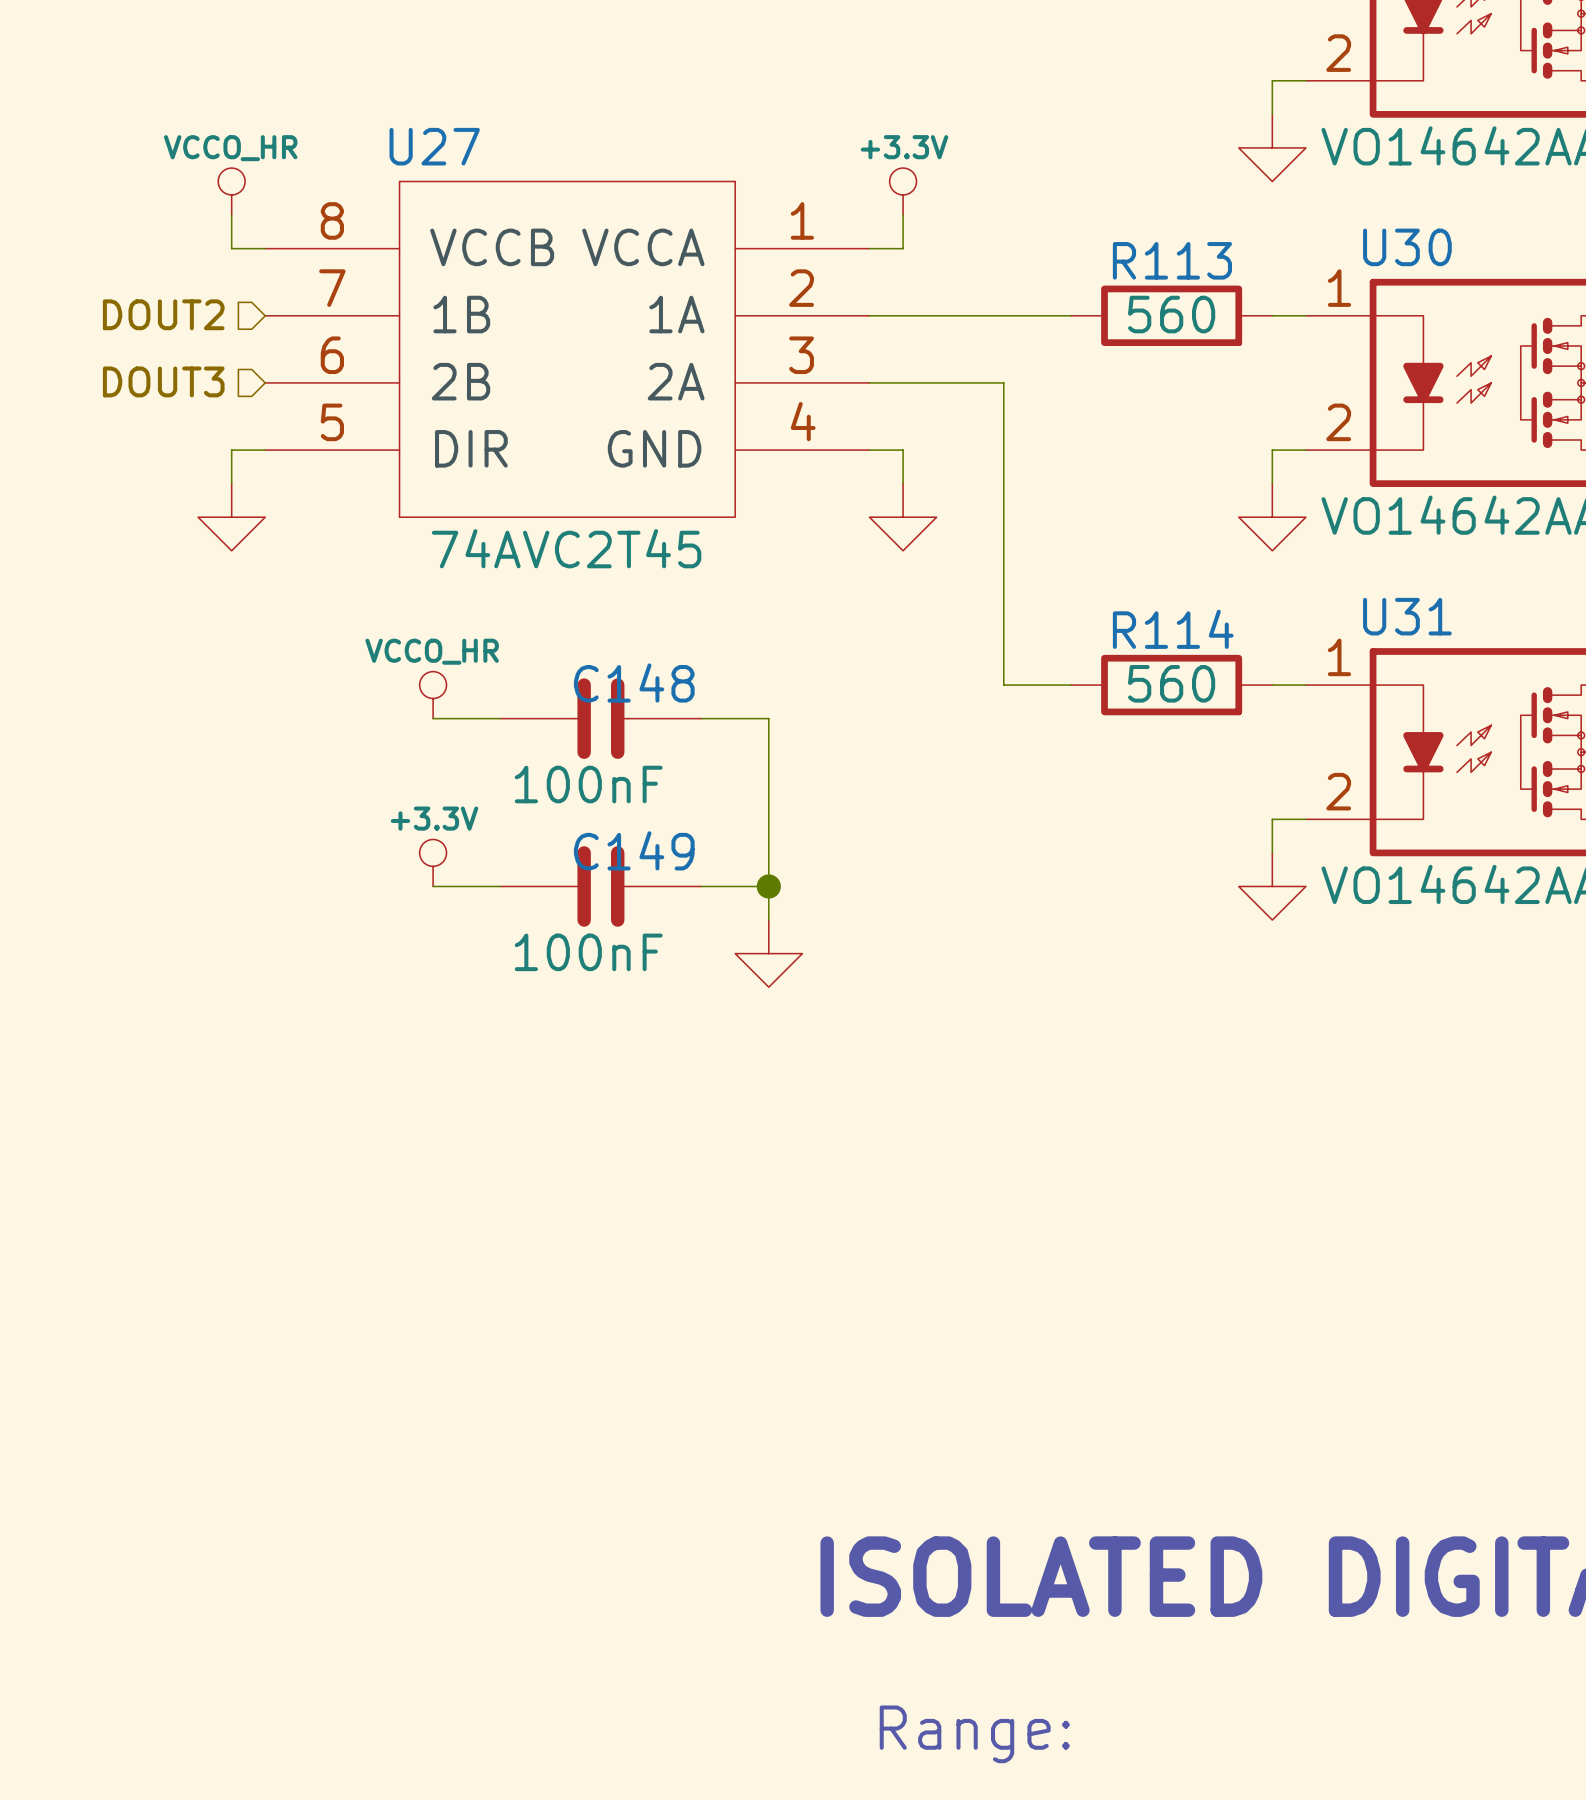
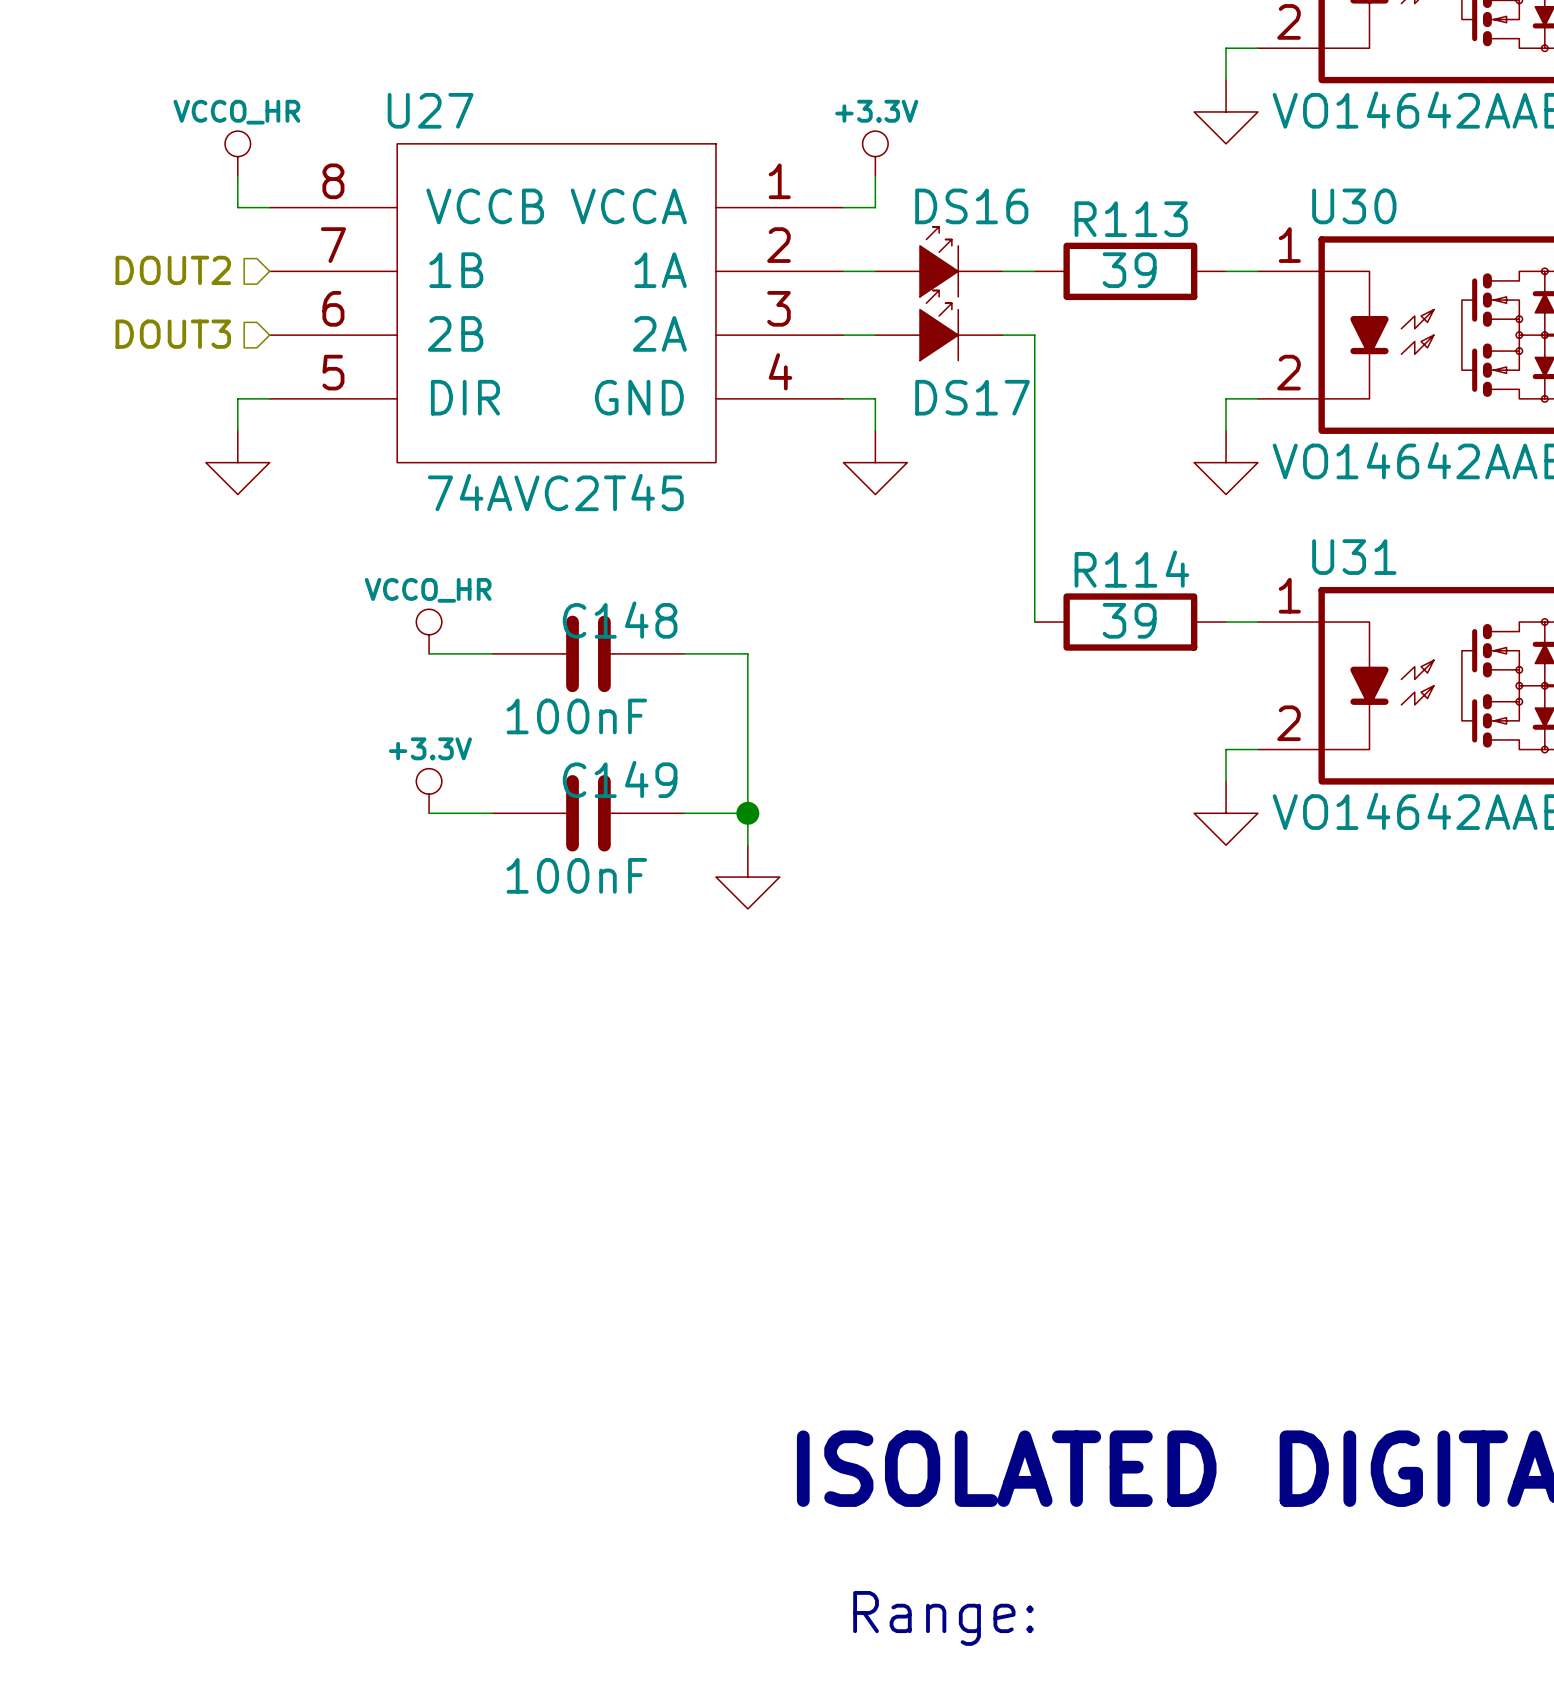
DS16: none -> (939, 261)
R113 value: 560 (1171, 314) -> 39 (1129, 270)
DS17: none -> (939, 325)
wire: (903, 382) (1003, 382) (1003, 685) (1070, 685) -> (1002, 335) (1034, 335) (1034, 622)
R114 value: 560 (1171, 683) -> 39 (1129, 620)

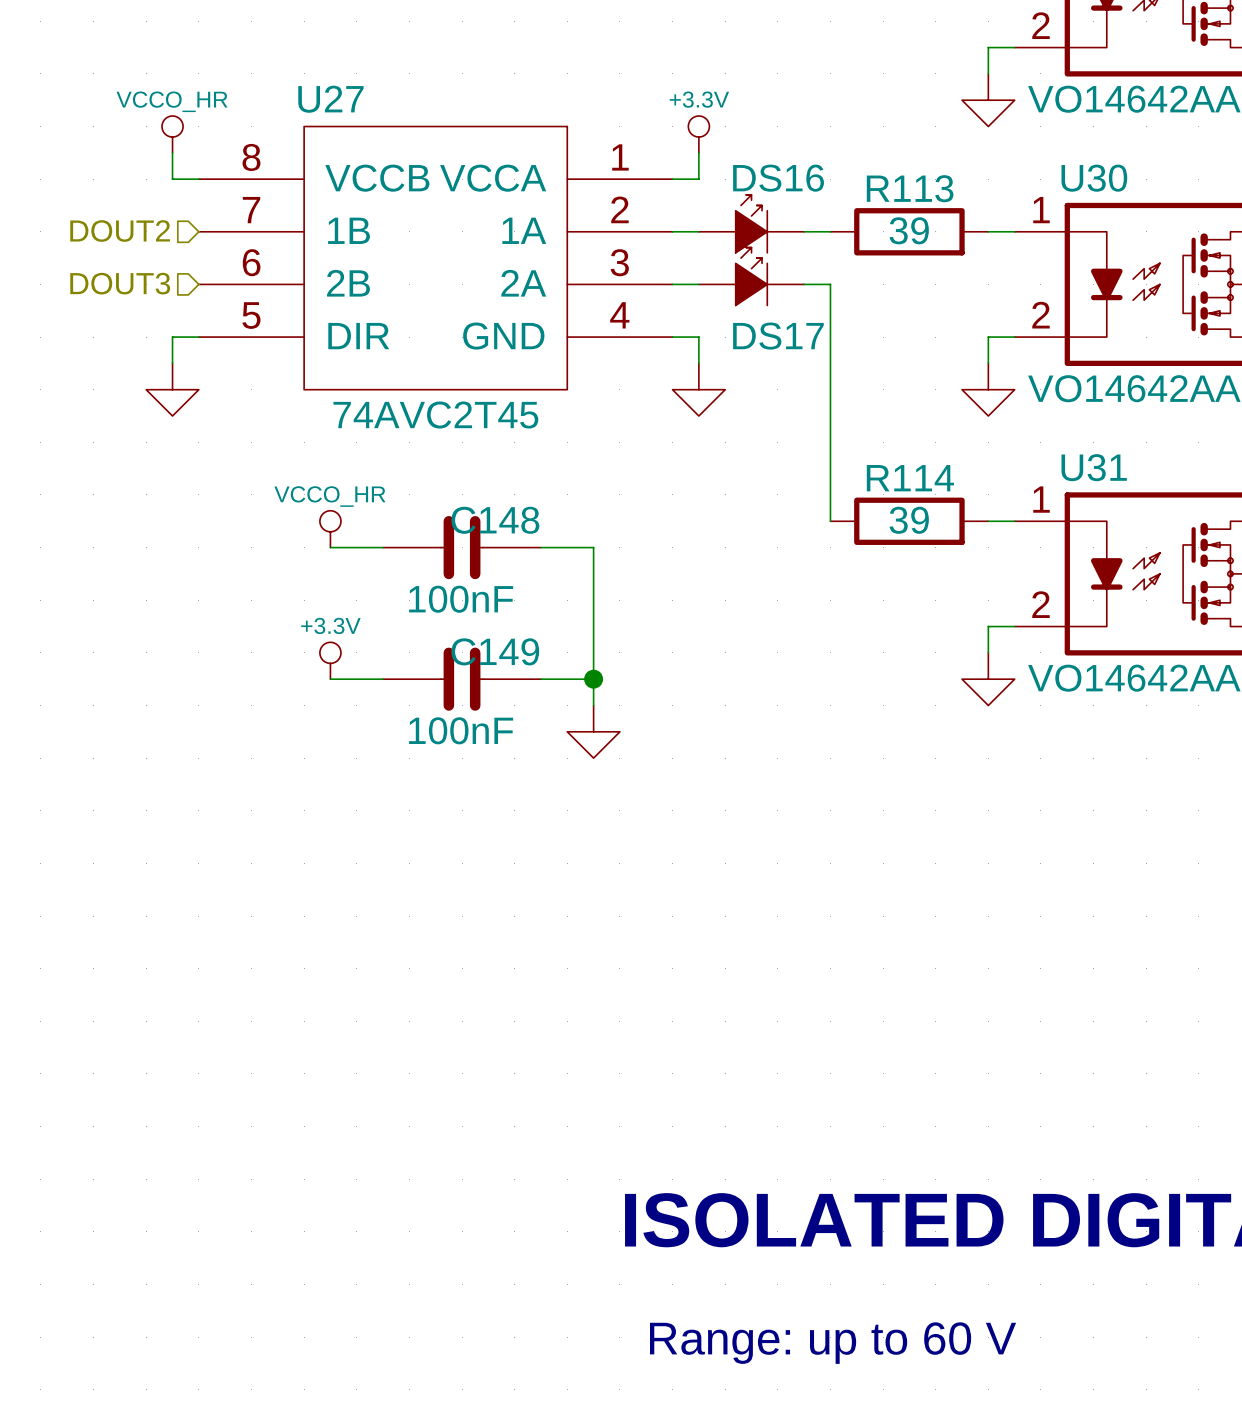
text: Range: (943, 1618) -> none
text: none -> Range: up to 60 V (833, 1343)

